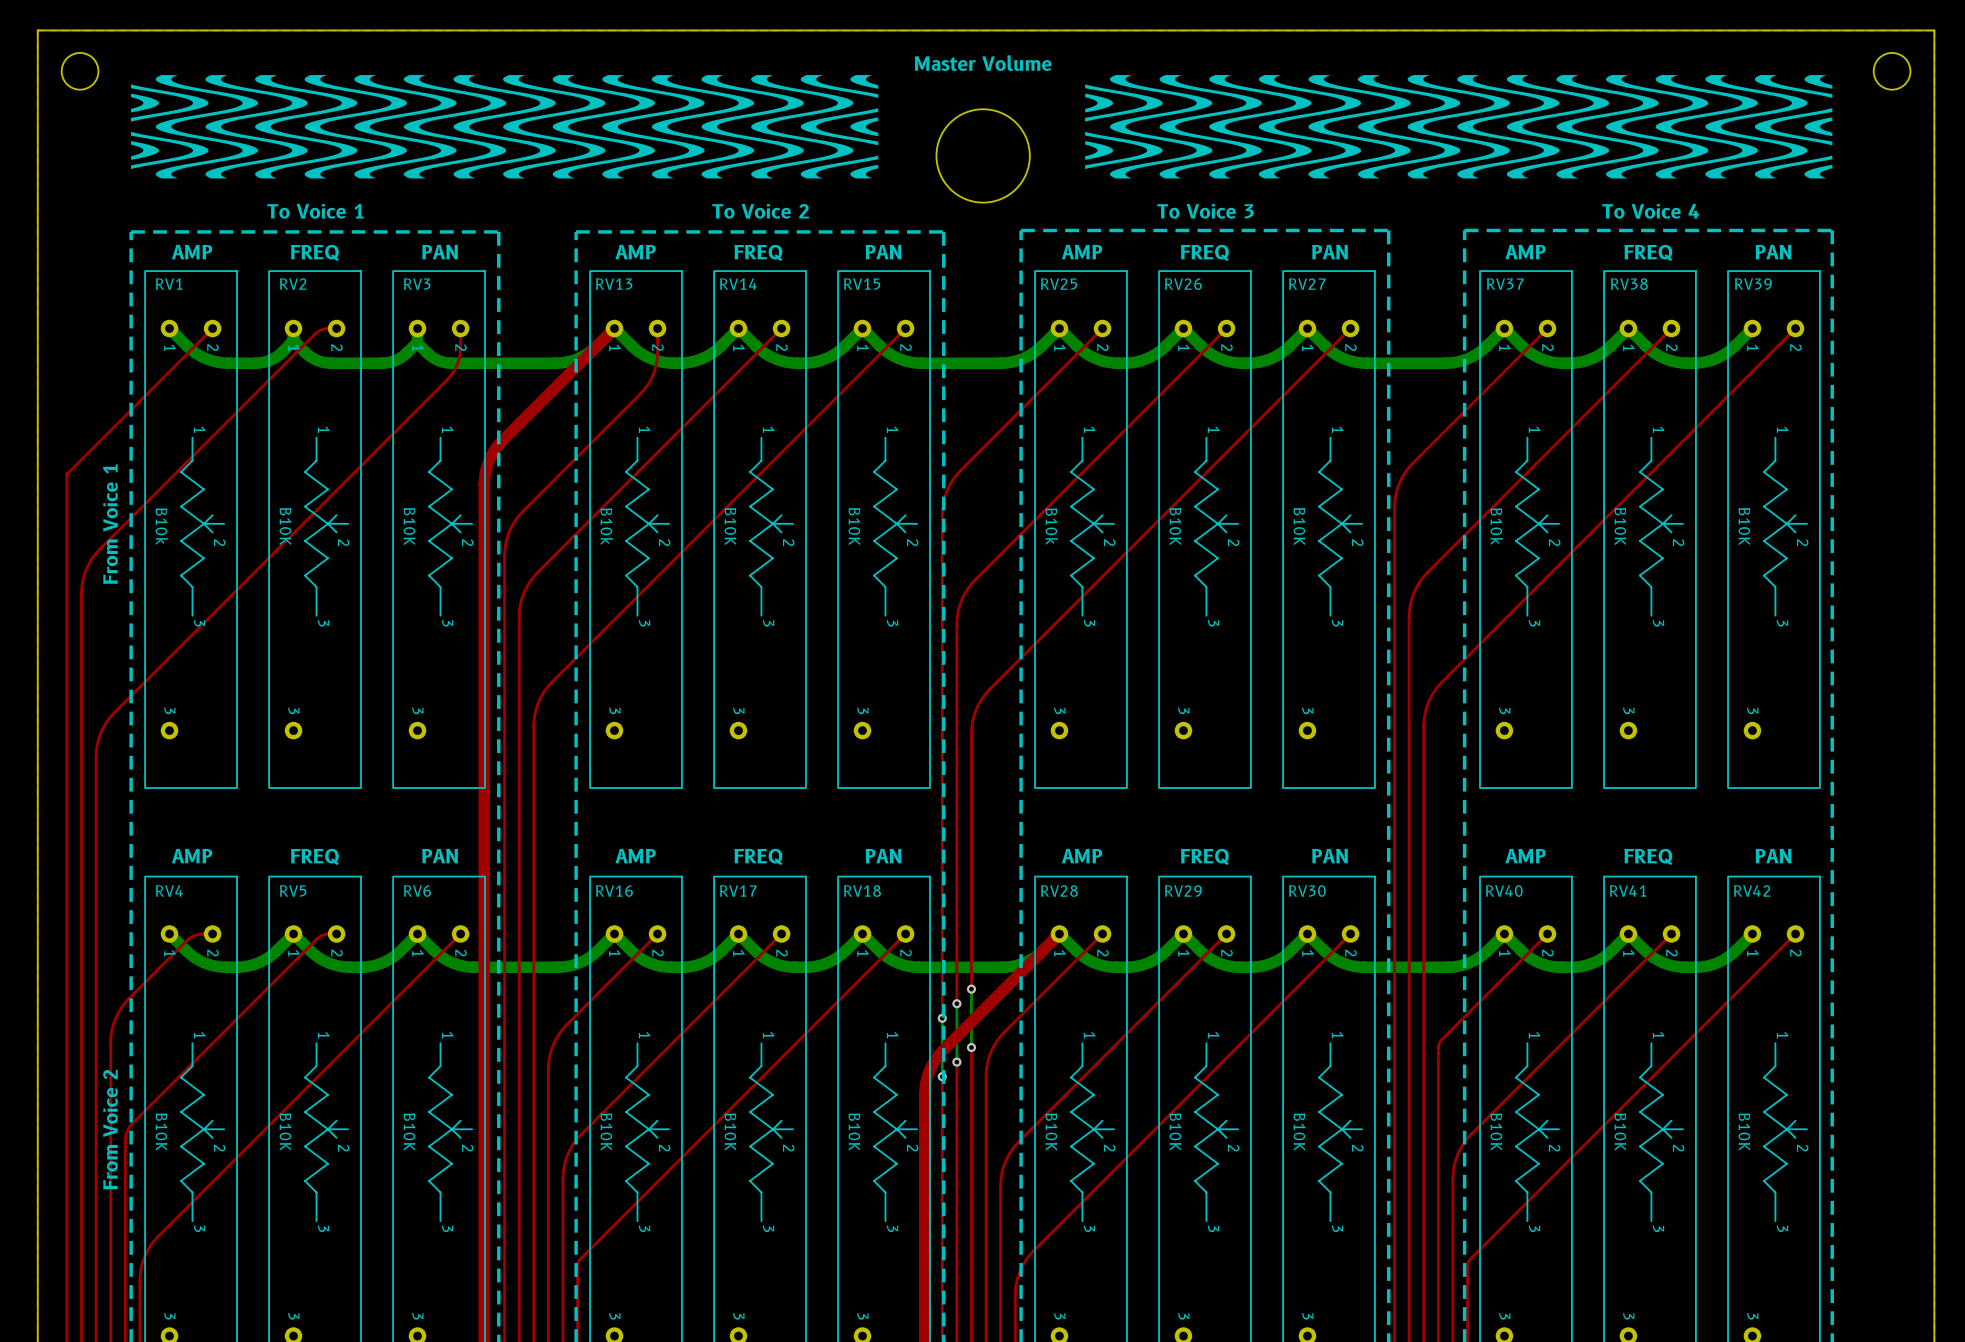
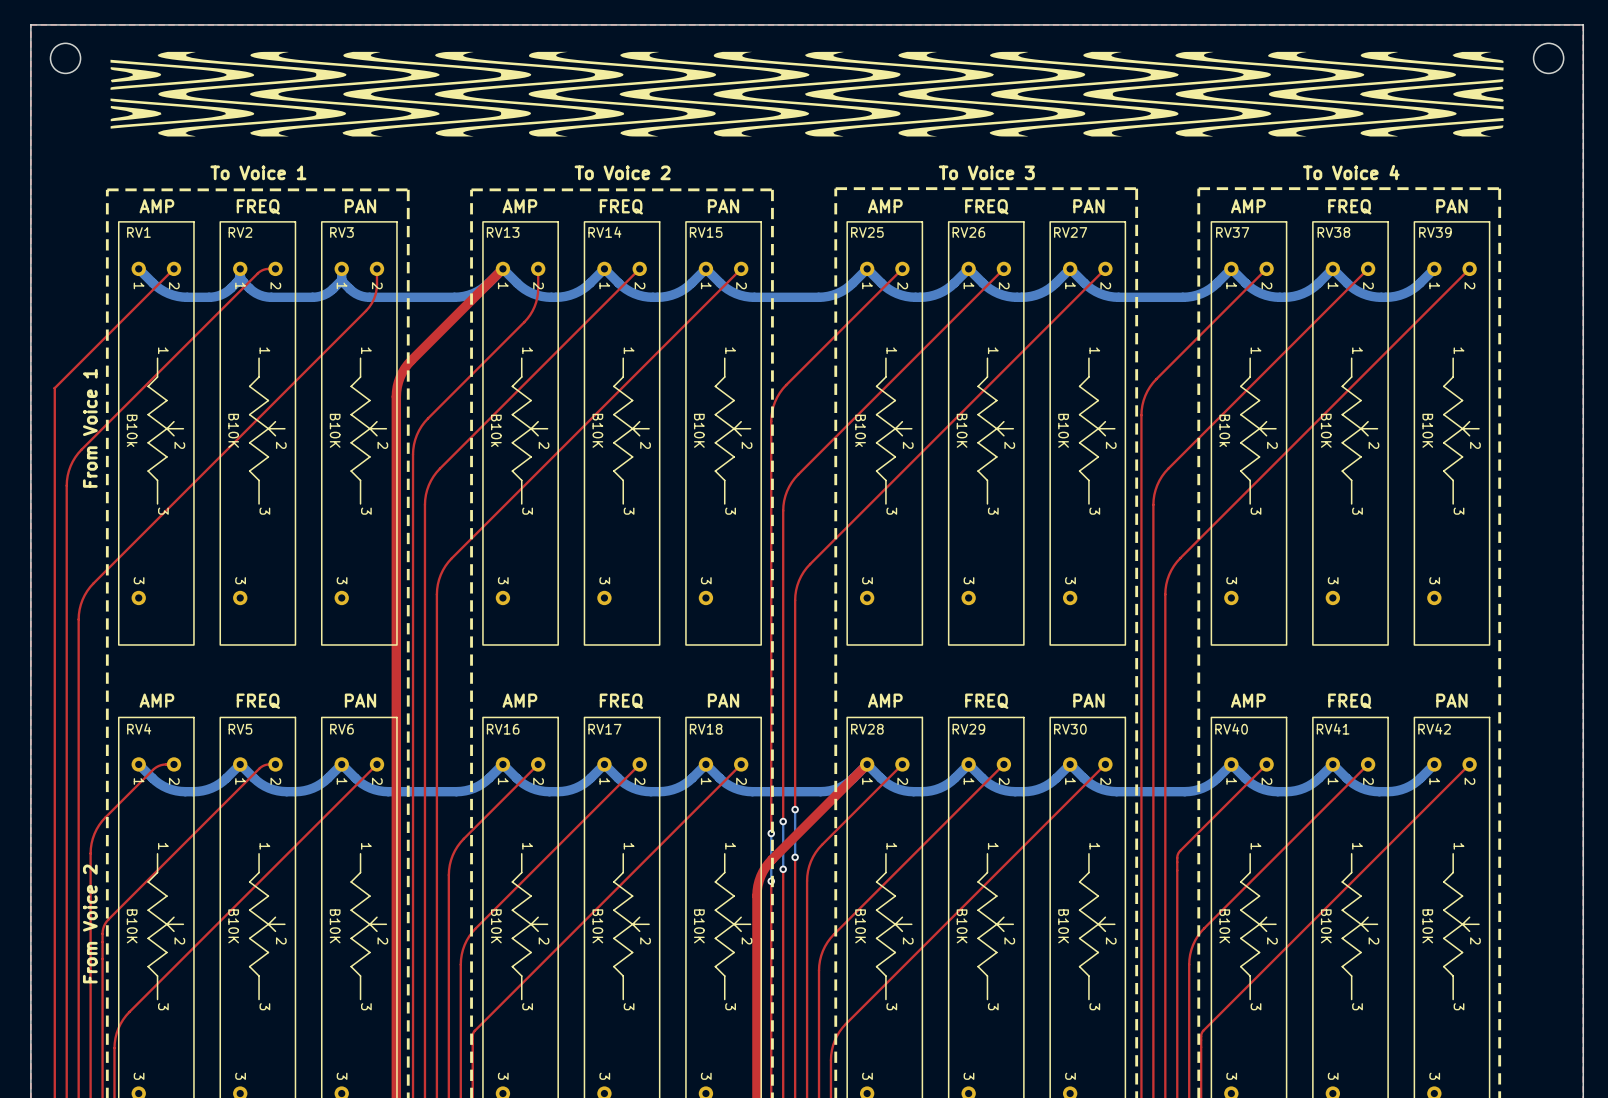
drawing: none -> [110, 51, 1504, 137]
text: Master Volume (983, 63) -> none
drawing: [131, 75, 879, 179] -> none
drawing: [1085, 75, 1833, 179] -> none
round board edge: [935, 108, 1031, 204] -> none

